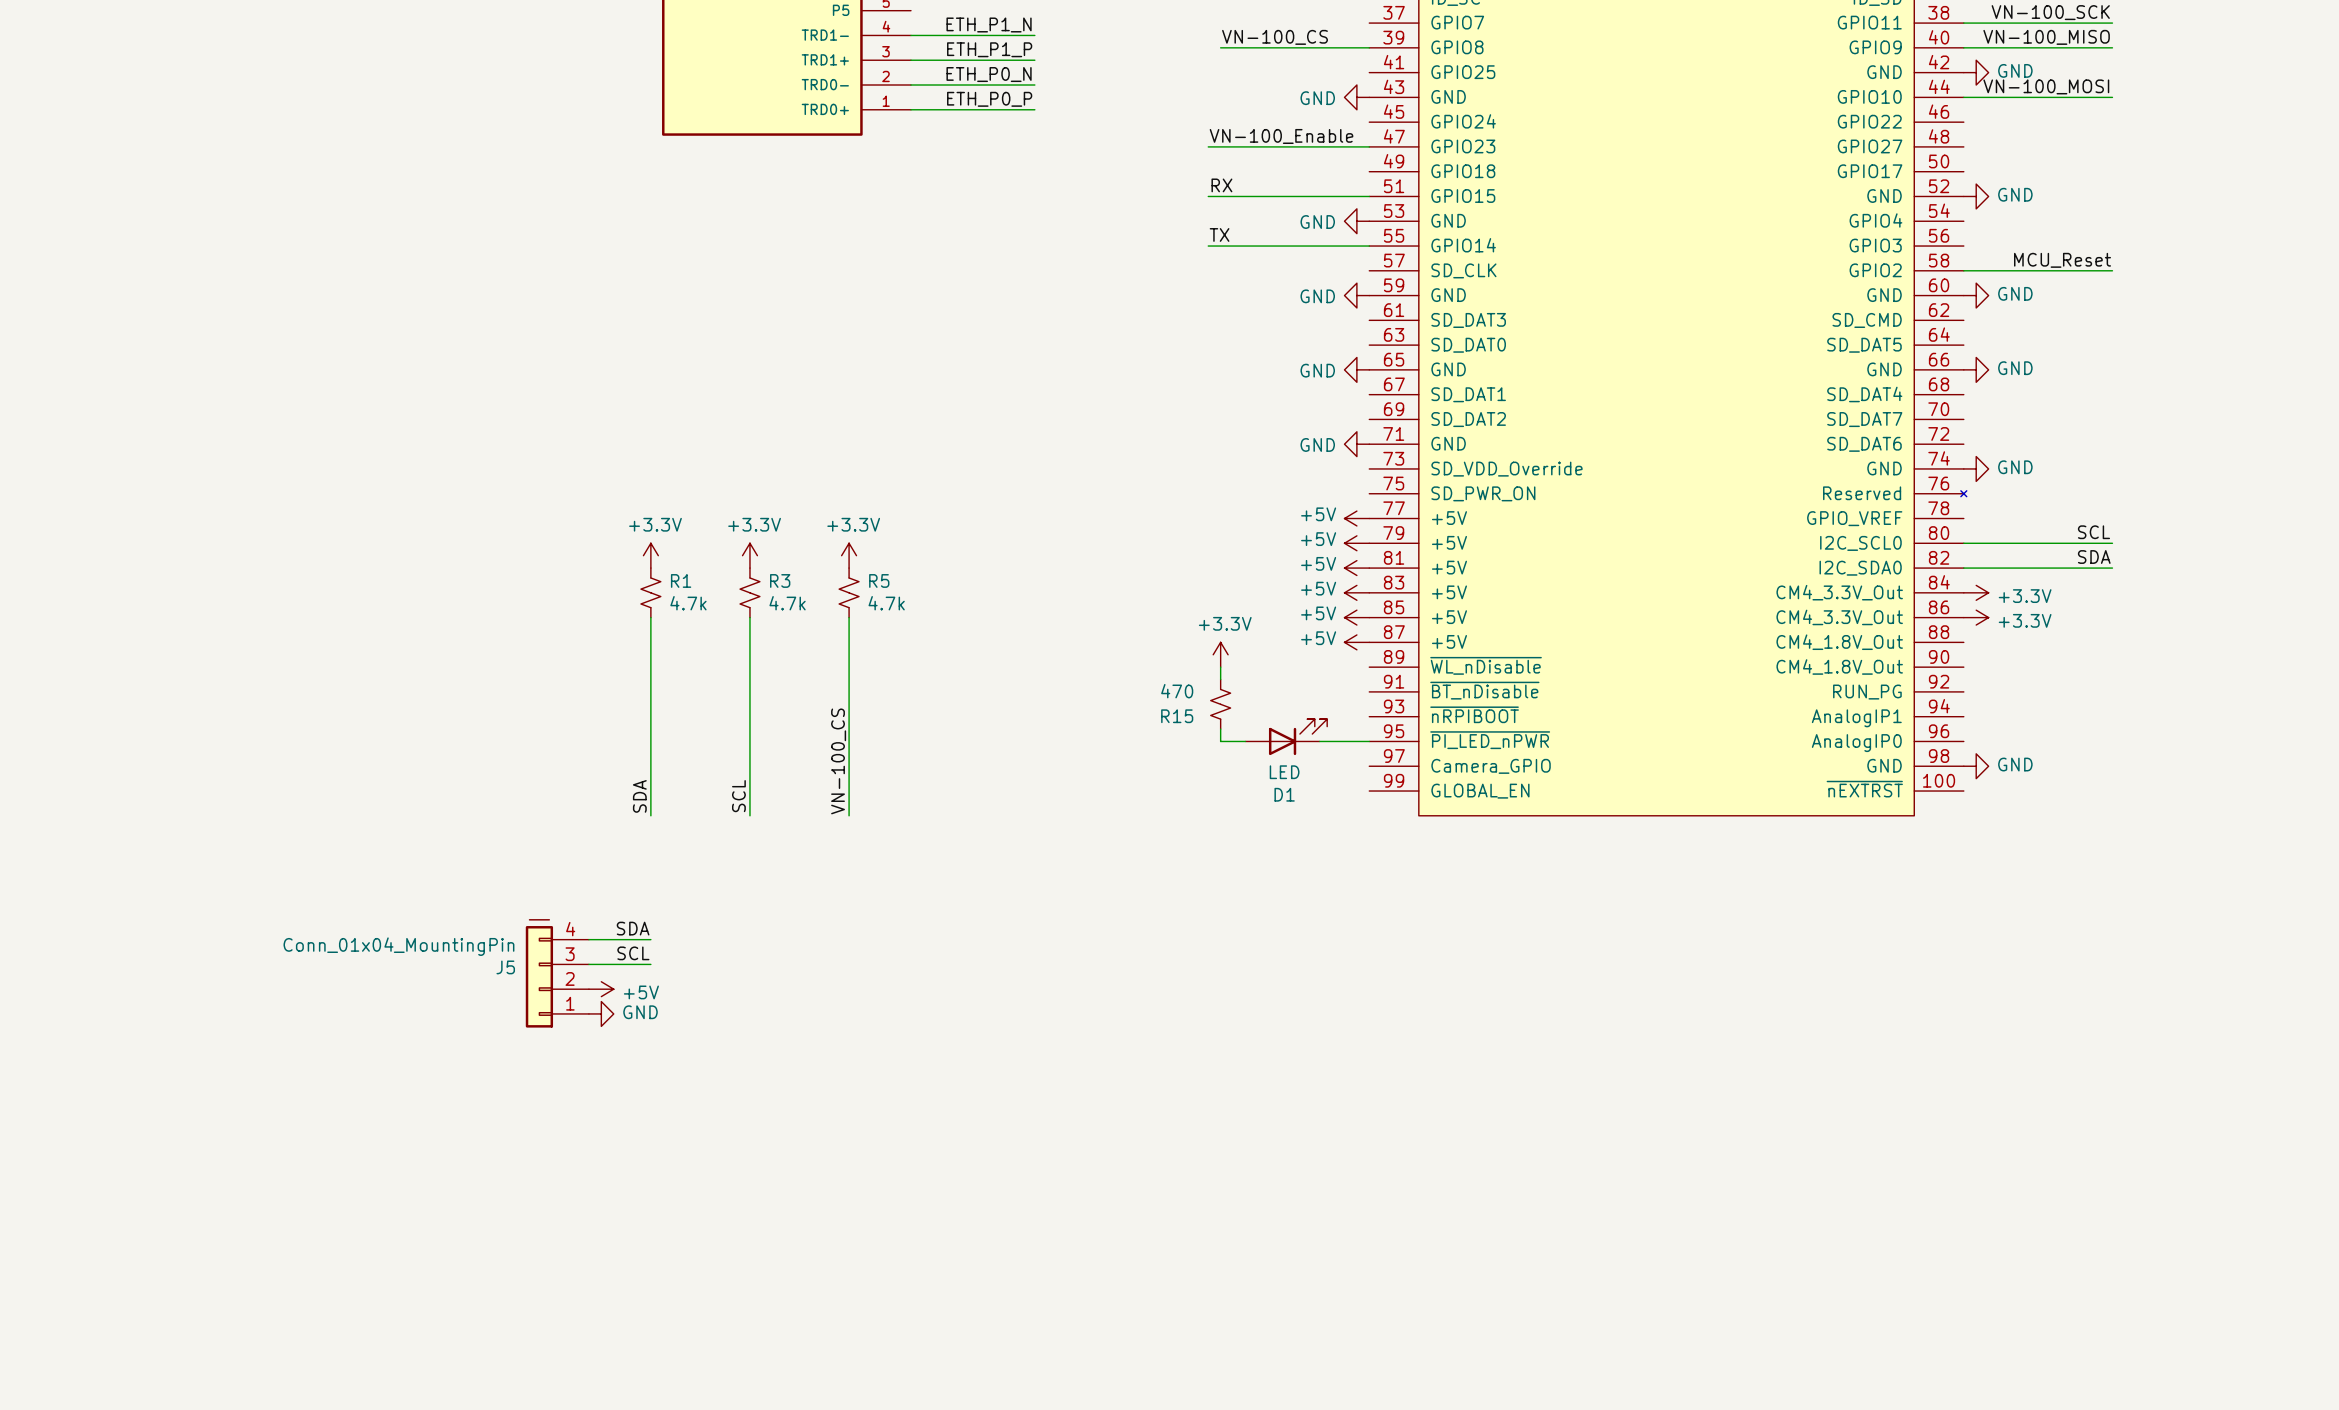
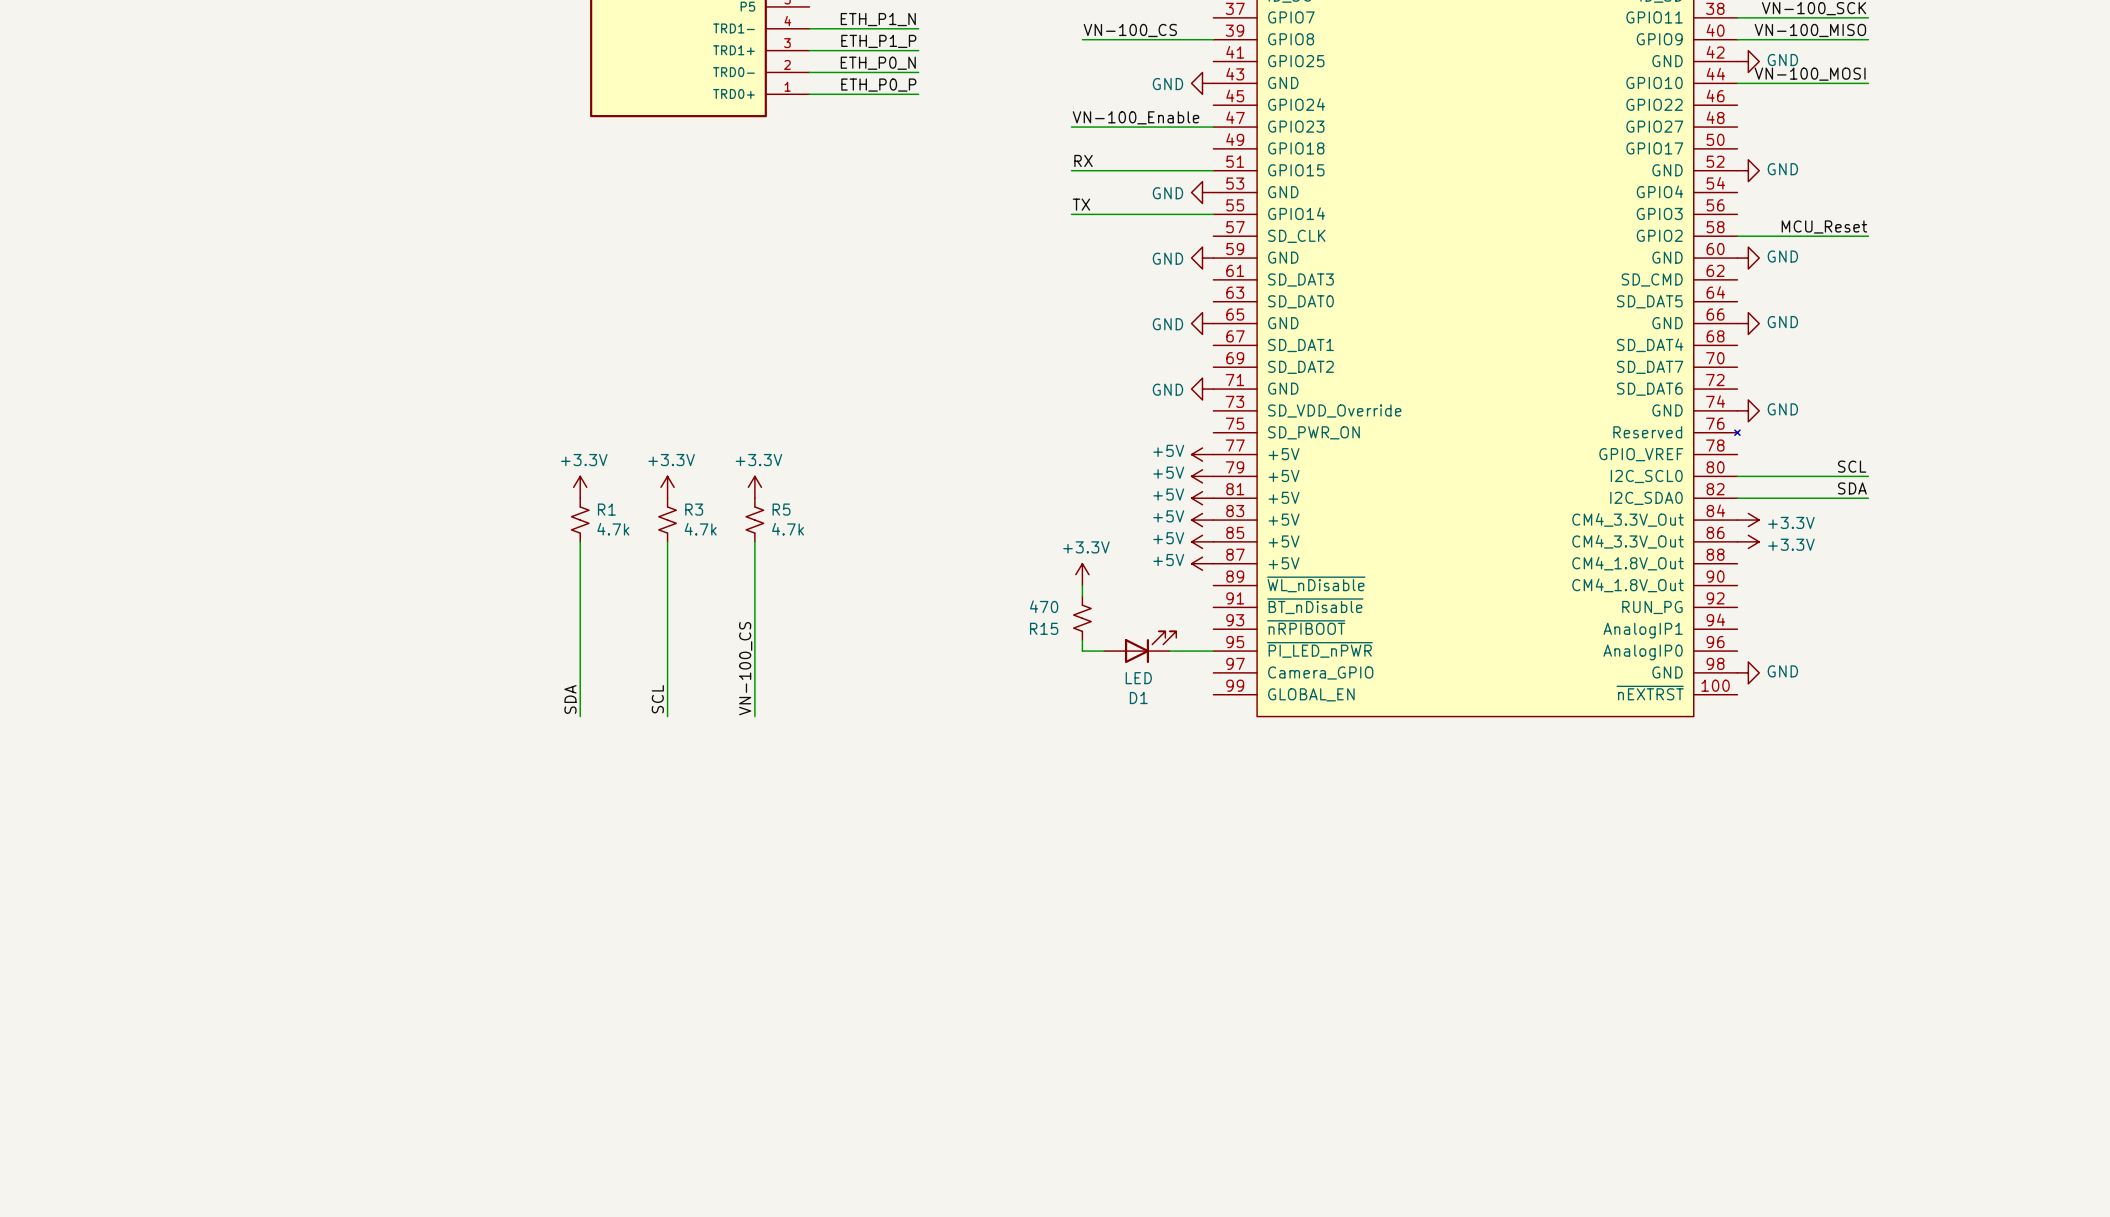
label: SDA (633, 928) -> none
wire: (588, 939) (650, 939) -> none
label: SCL (633, 953) -> none
wire: (588, 964) (650, 964) -> none
J5: Conn_01x04_MountingPin (557, 973) -> none
power symbol: +5V (601, 989) -> none
power symbol: GND (601, 1013) -> none

